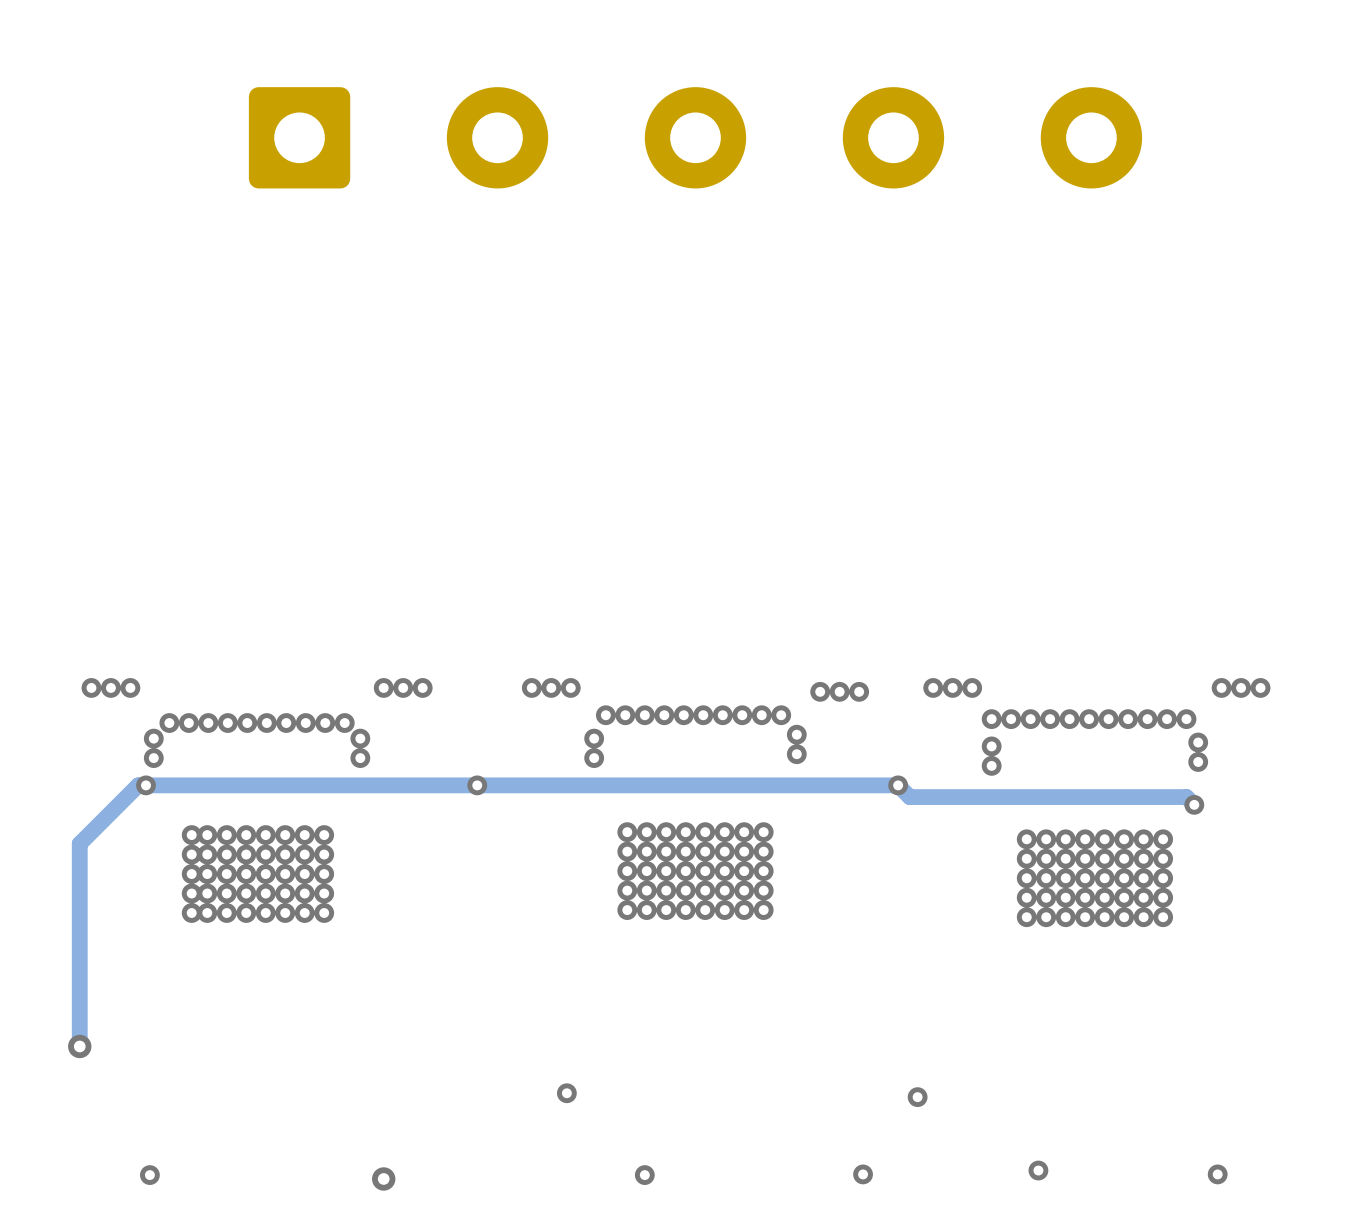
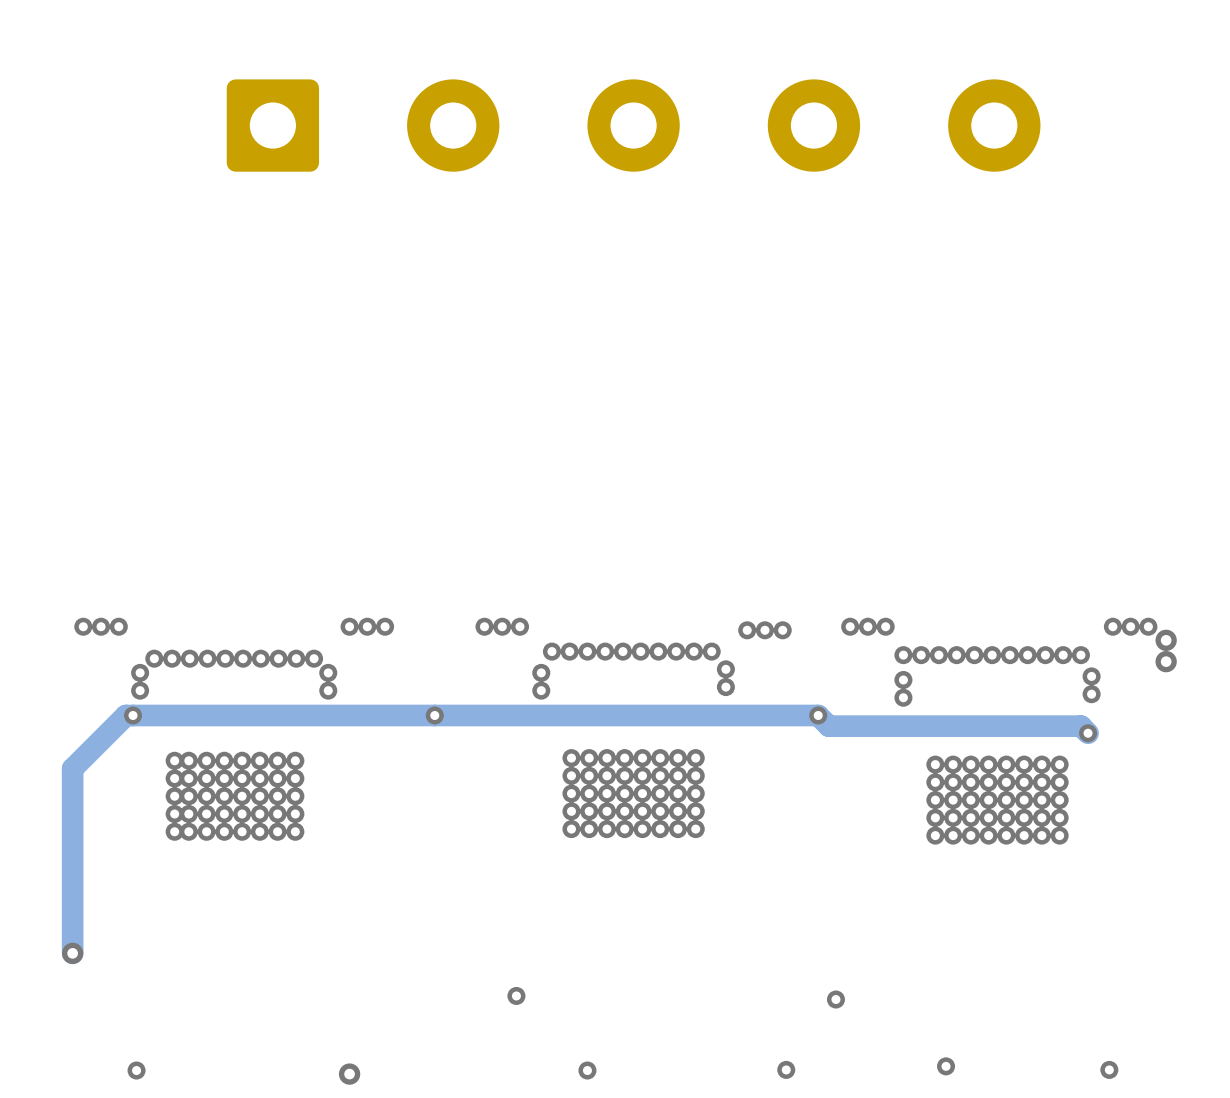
via: none -> (1166, 640)
via: none -> (1166, 661)
track width: thin (1194, 804) (1186, 797) (909, 797) (898, 785) (138, 785) (79, 843) (79, 1046) -> thick (1088, 733) (1080, 726) (828, 726) (818, 715) (125, 715) (72, 768) (72, 953)

